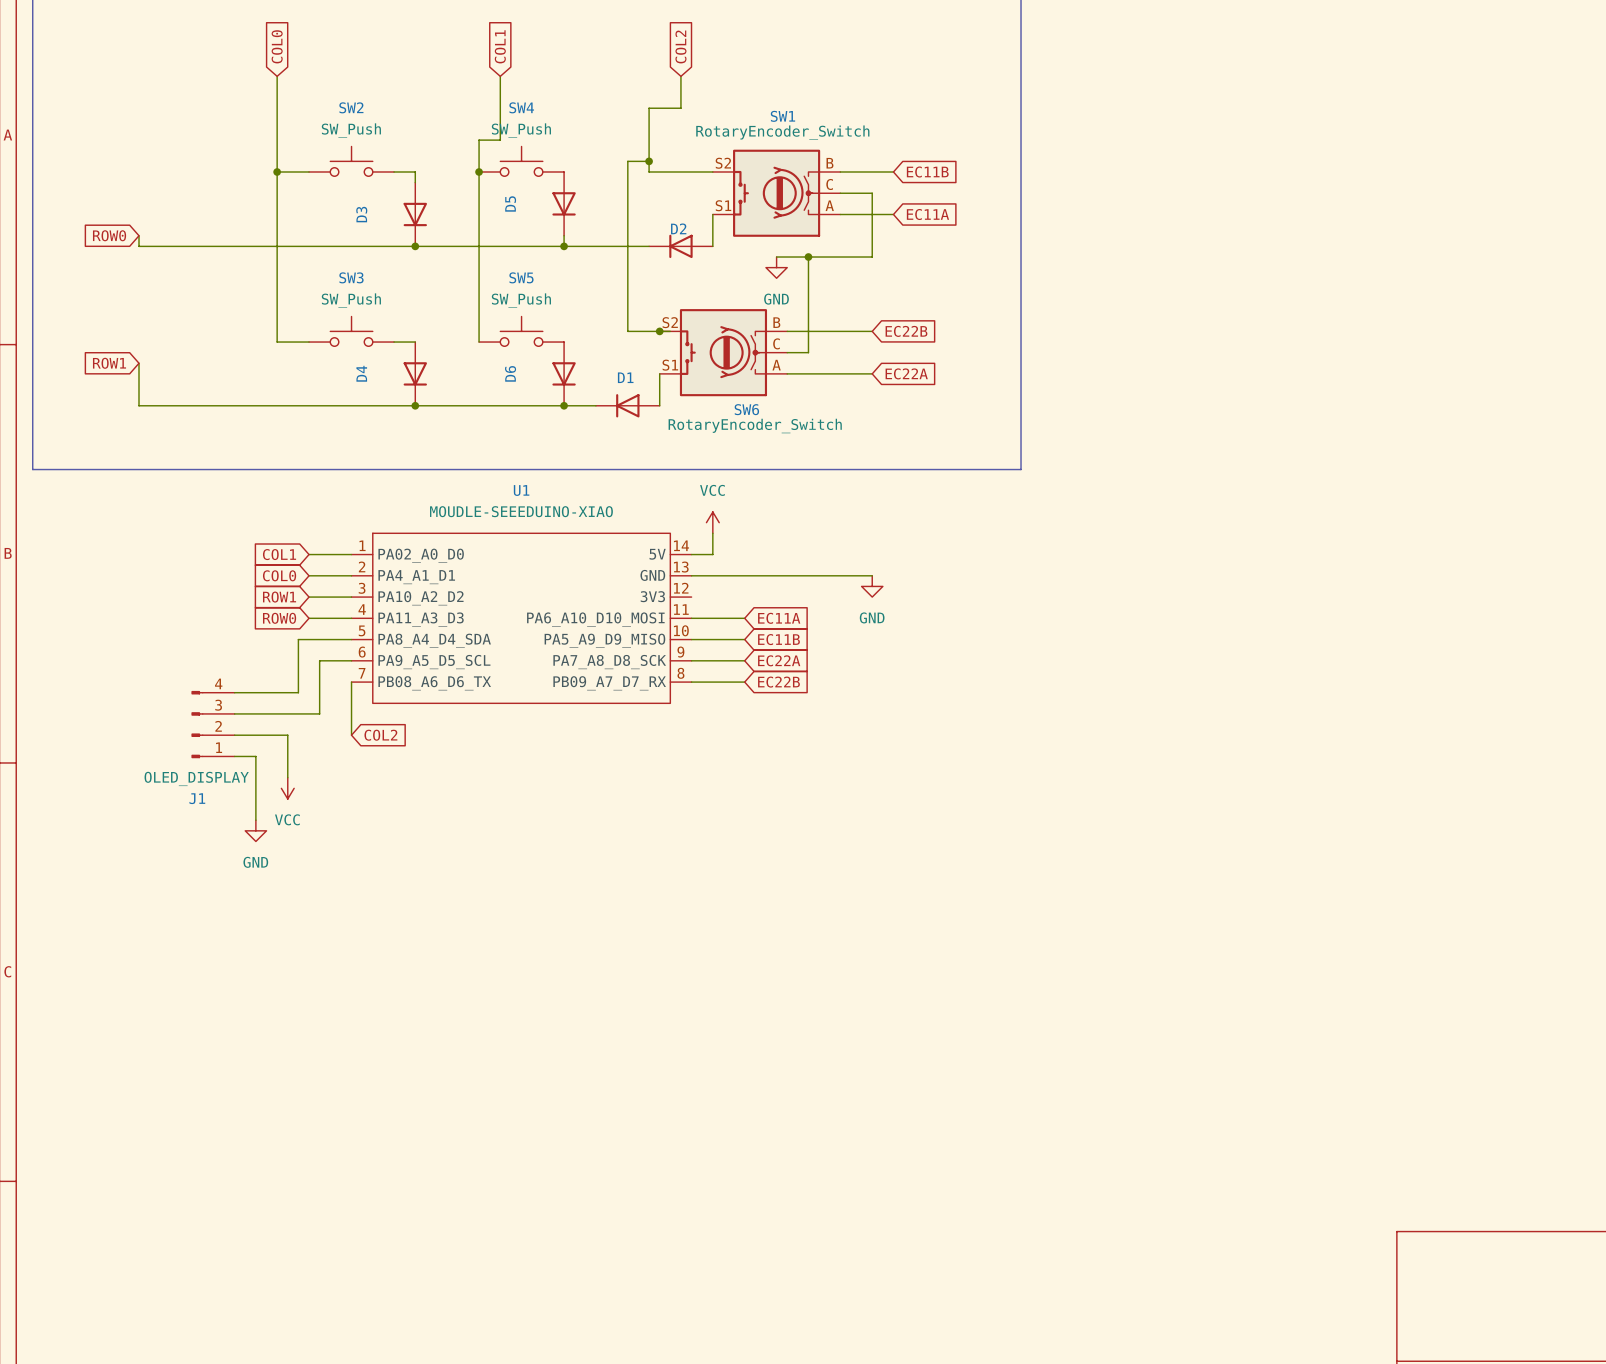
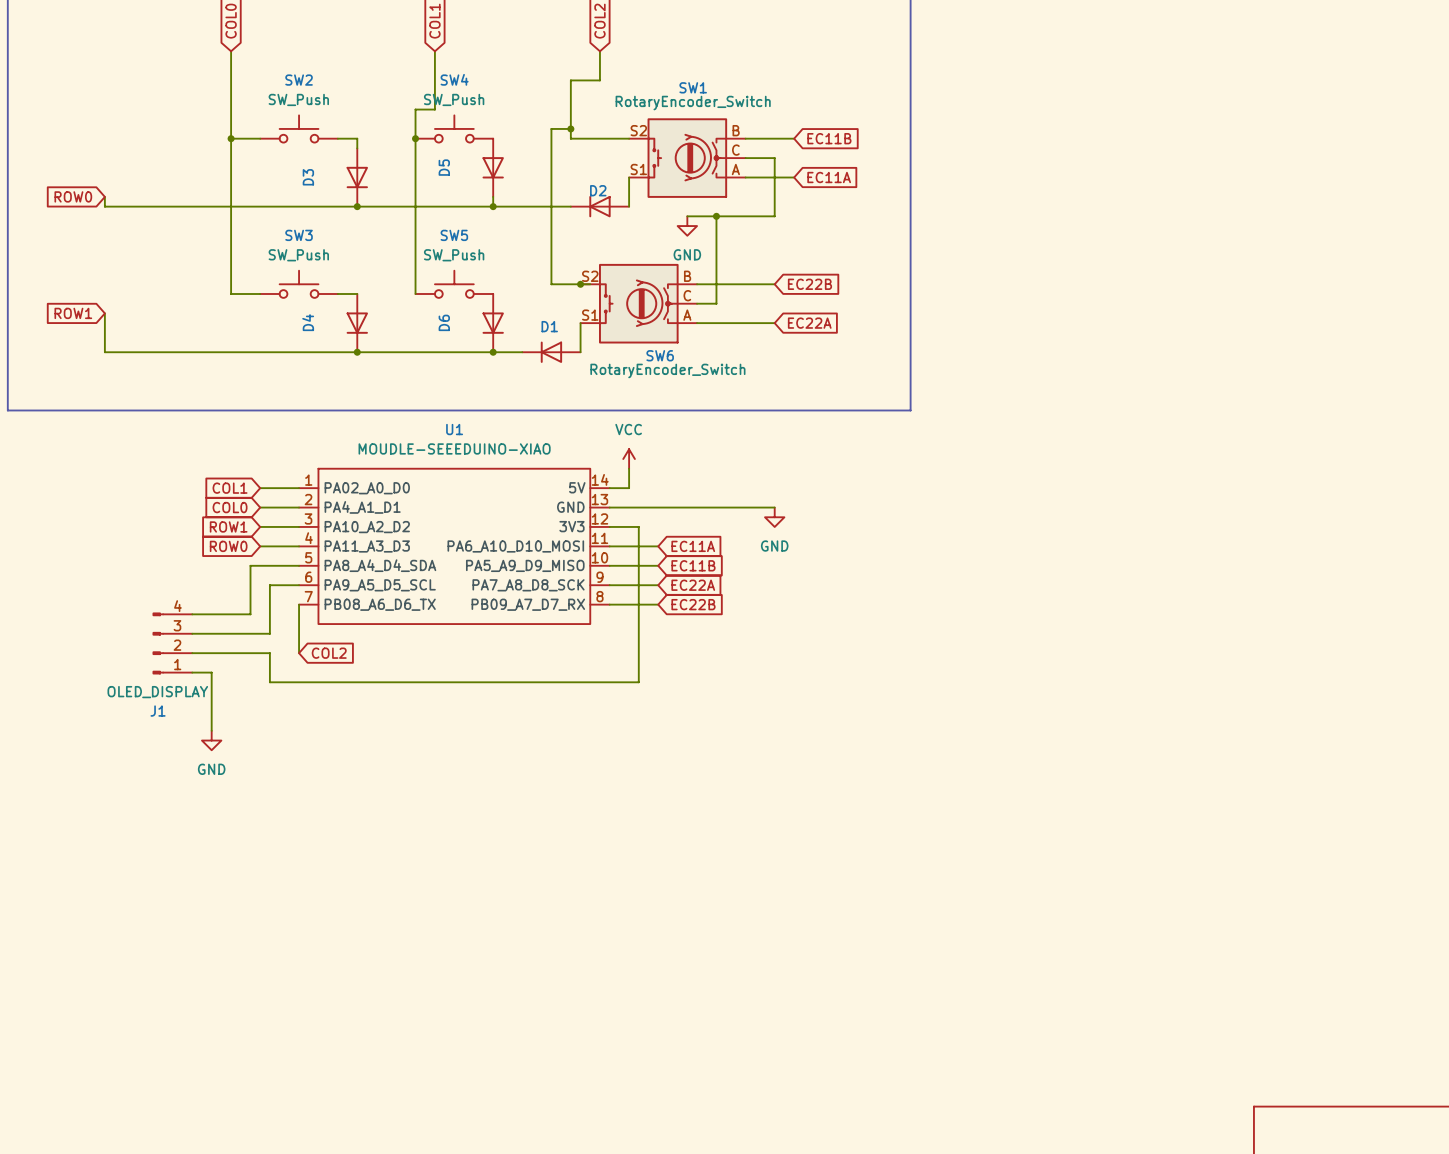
wire: (287, 735) (287, 777) -> (240, 653) (269, 653) (269, 682) (638, 682) (638, 526) (609, 526)
power symbol: VCC (287, 788) -> none

